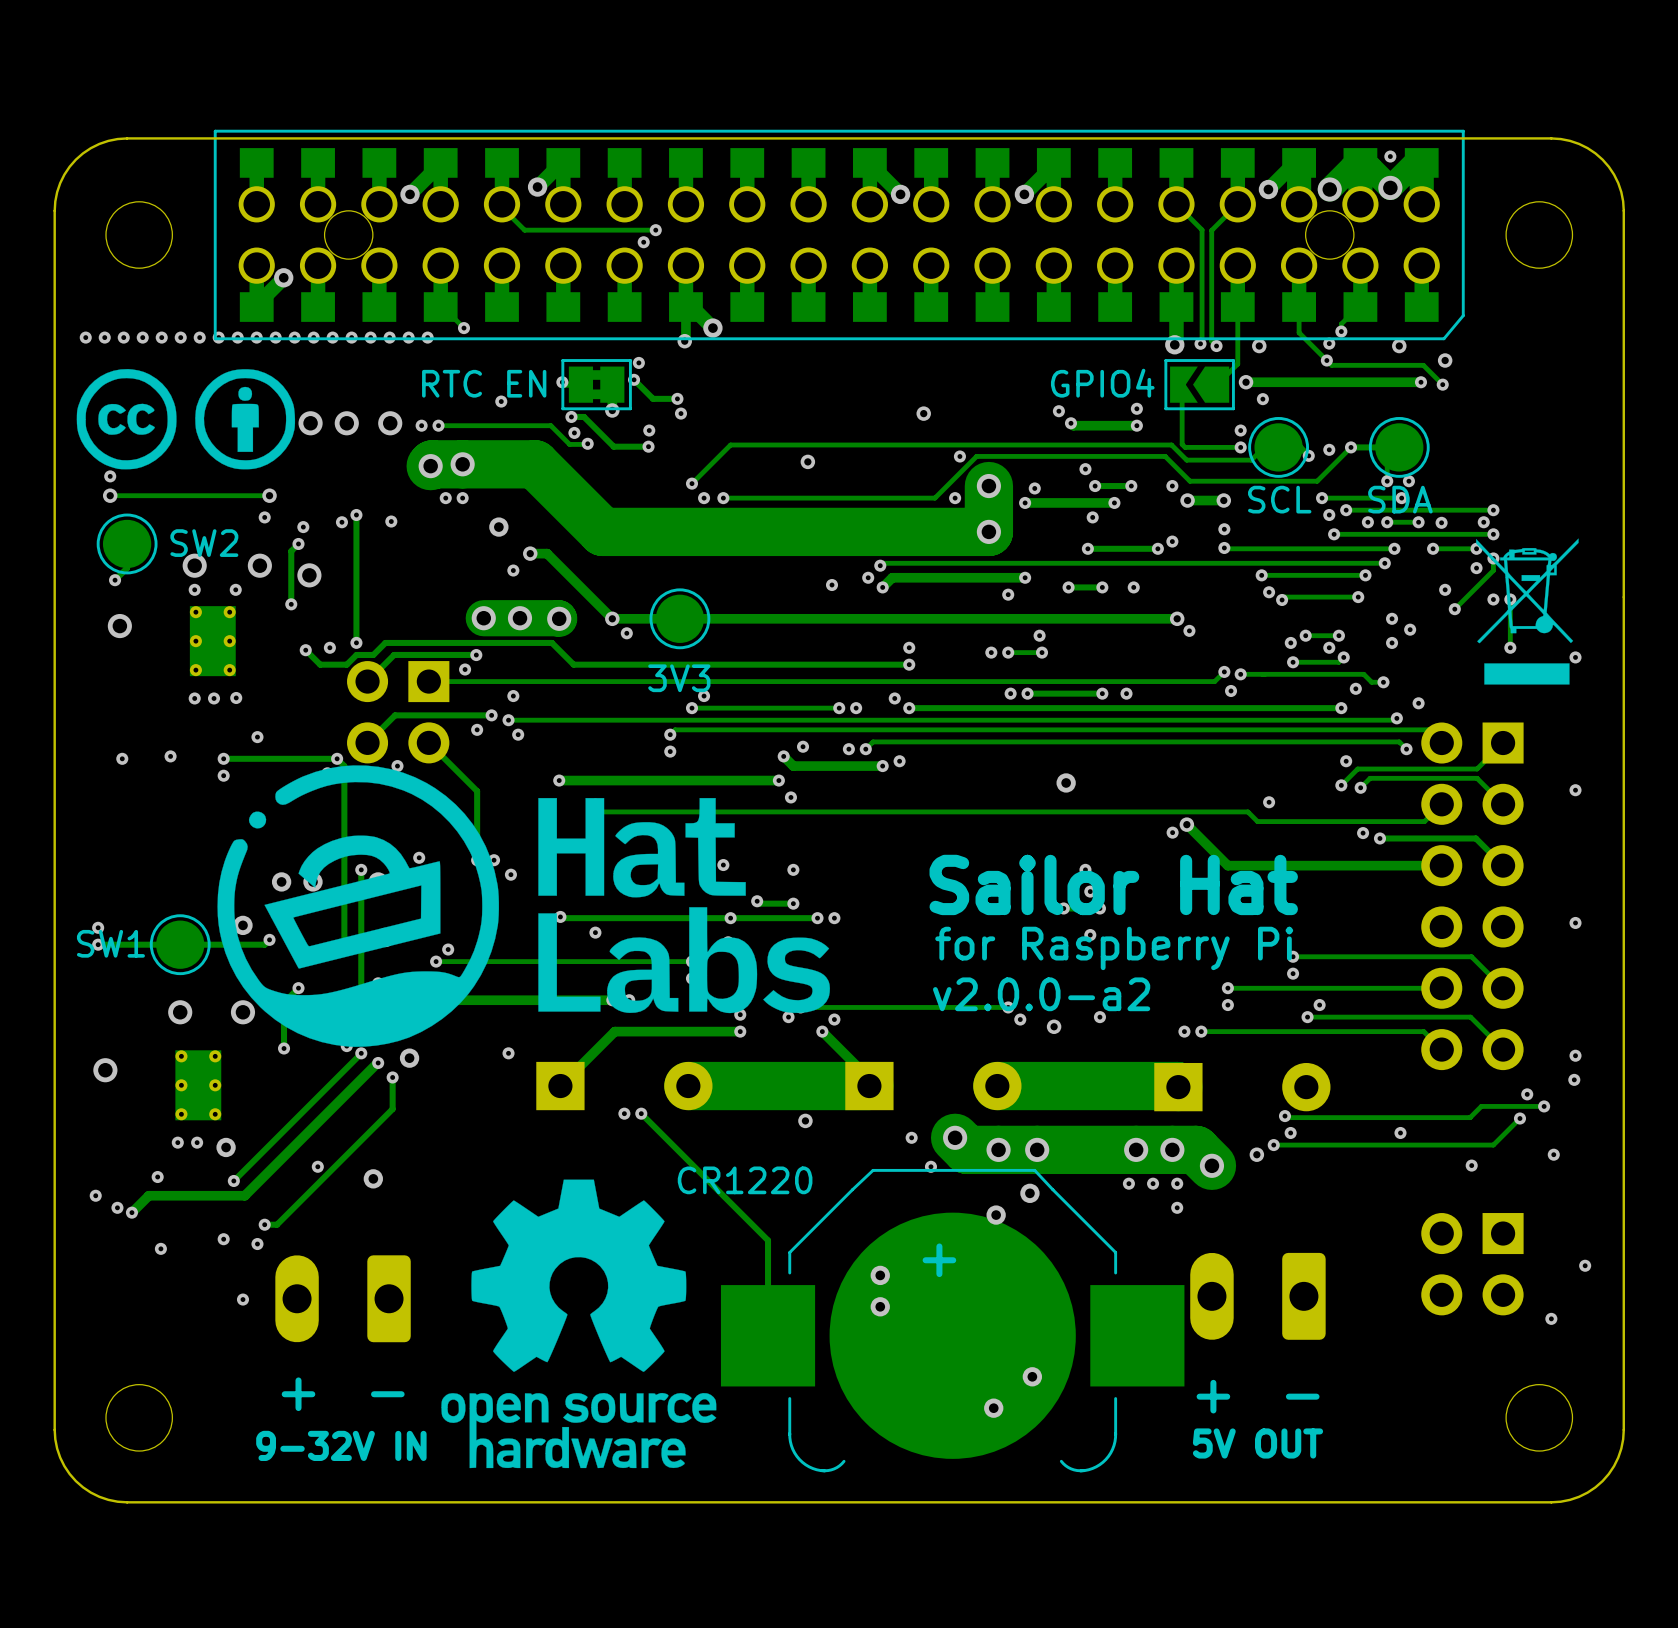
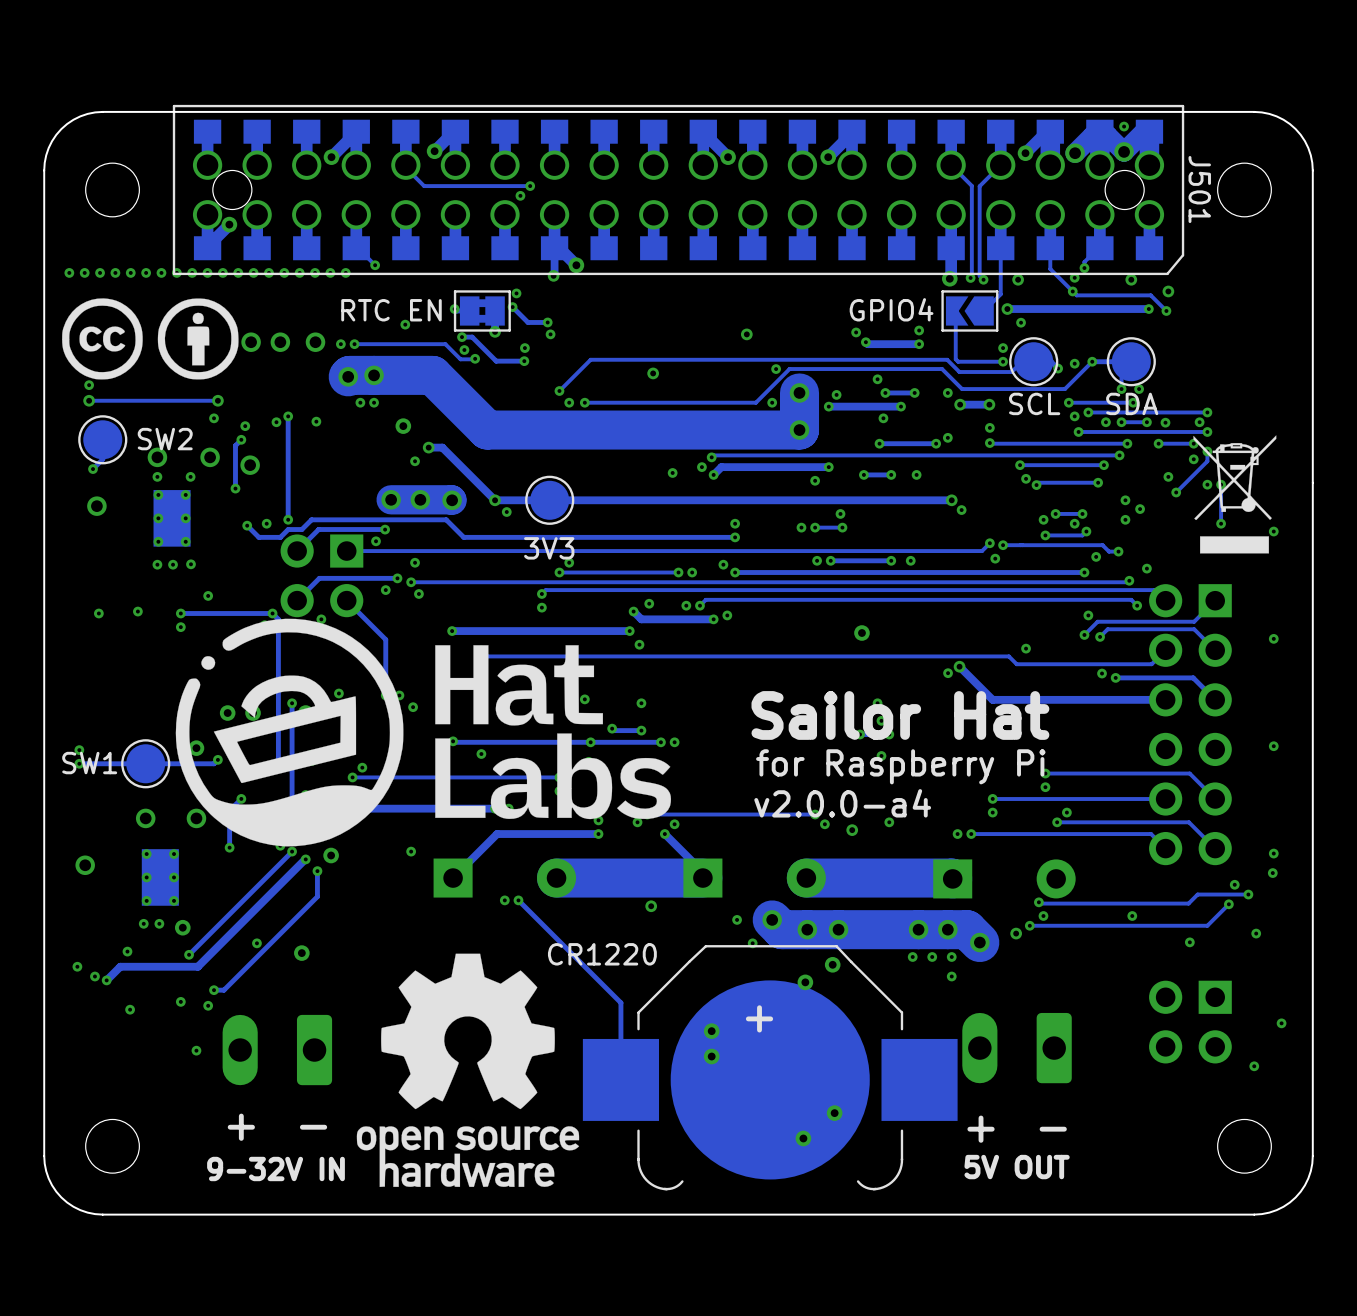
part: (839, 234) -> none
J501: none -> (678, 189)
text: v2.0.0-a2 (1041, 994) -> v2.0.0-a4 (842, 803)

